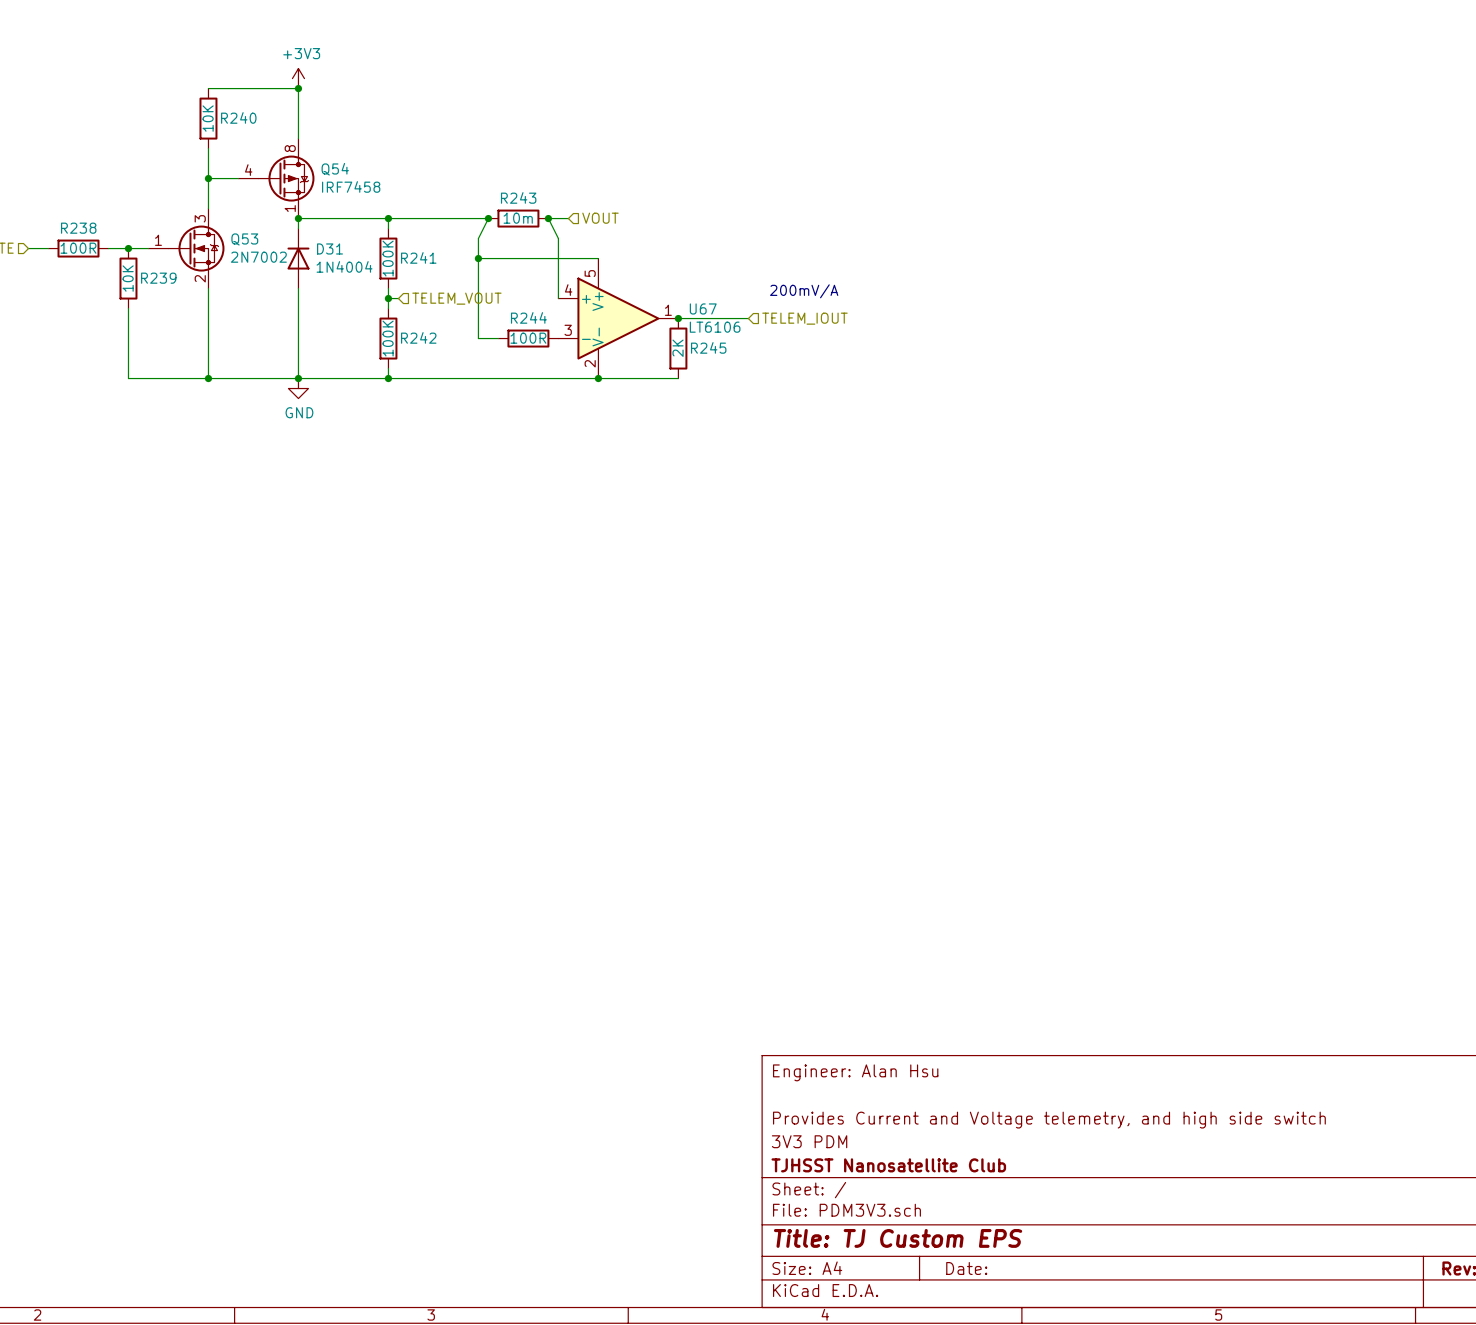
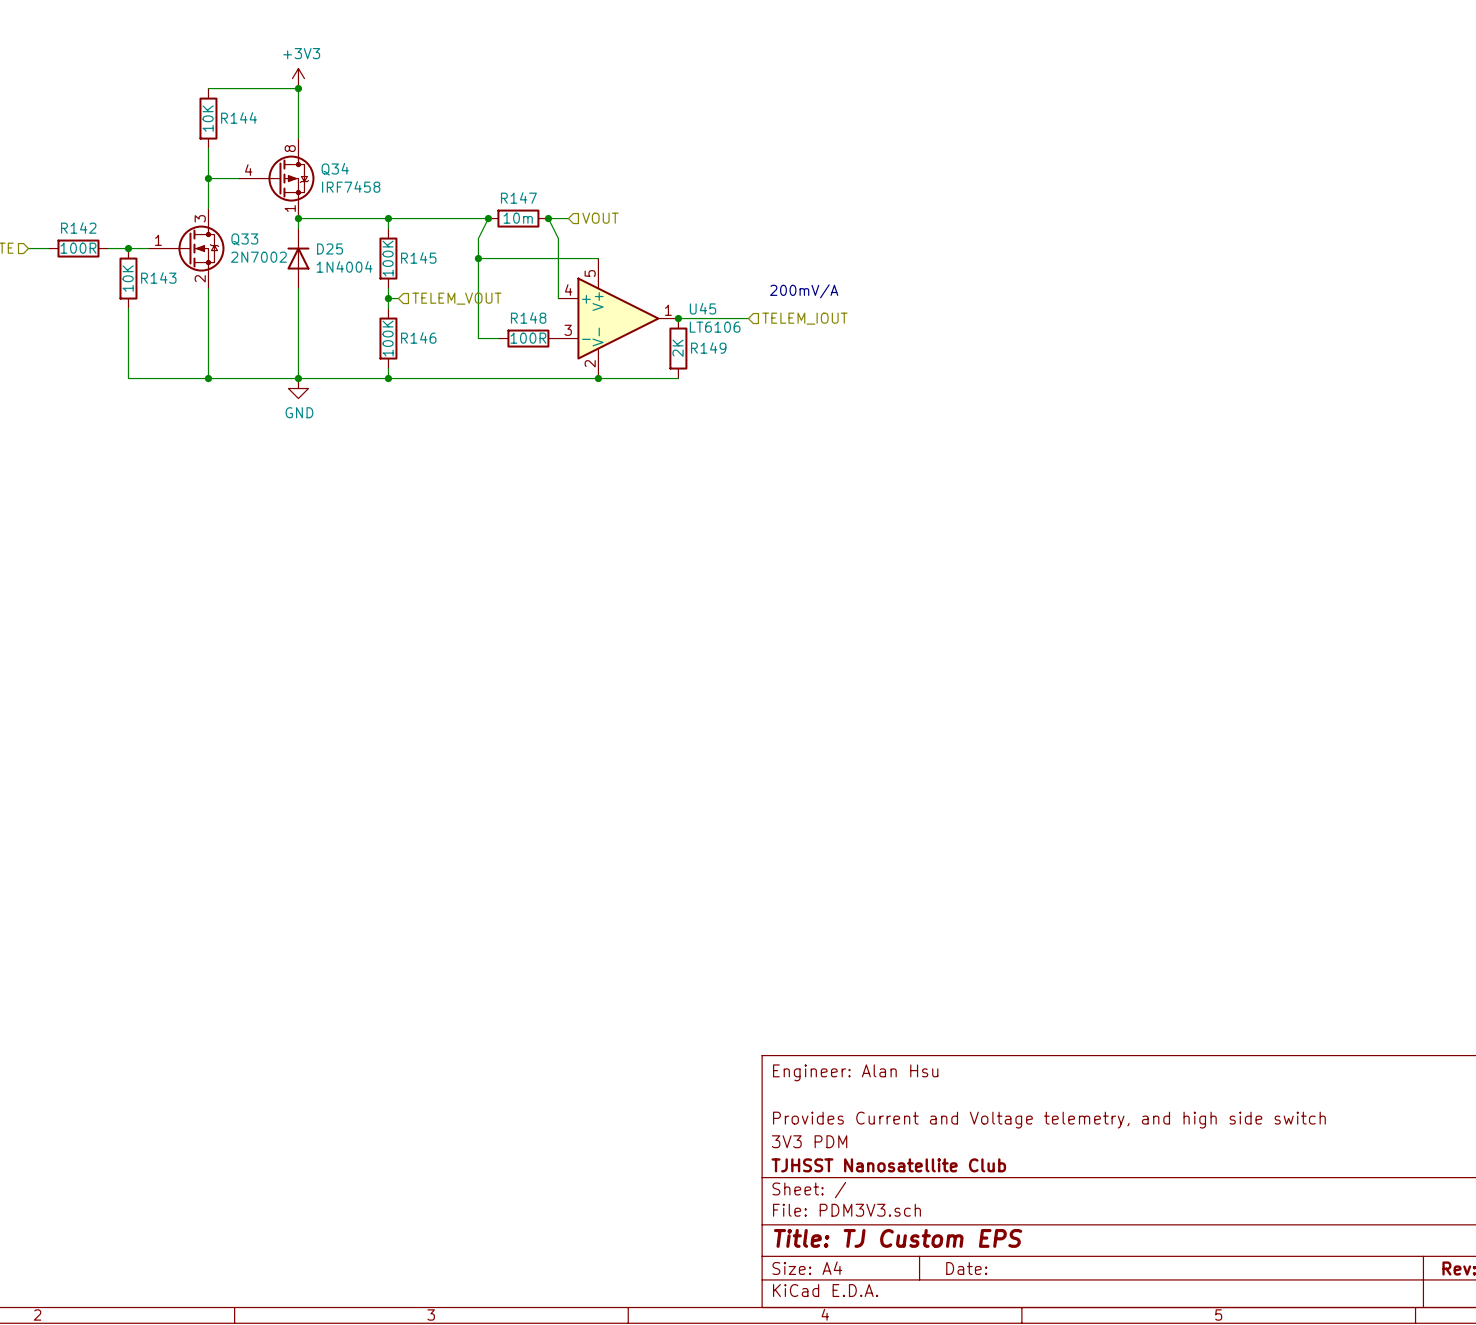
R240 name: R240 (238, 117) -> R144 (239, 117)
Q54 name: Q54 (335, 169) -> Q34 (335, 169)
R243 name: R243 (518, 197) -> R147 (518, 197)
R238 name: R238 (78, 228) -> R142 (78, 227)
Q53 name: Q53 (244, 239) -> Q33 (244, 239)
D31 name: D31 (330, 248) -> D25 (330, 248)
R241 name: R241 (418, 257) -> R145 (418, 257)
R239 name: R239 (158, 278) -> R143 (158, 277)
U67 name: U67 (703, 308) -> U45 (702, 308)
R244 name: R244 (528, 317) -> R148 (528, 317)
R242 name: R242 (418, 337) -> R146 (418, 337)
R245 name: R245 (708, 347) -> R149 (708, 347)

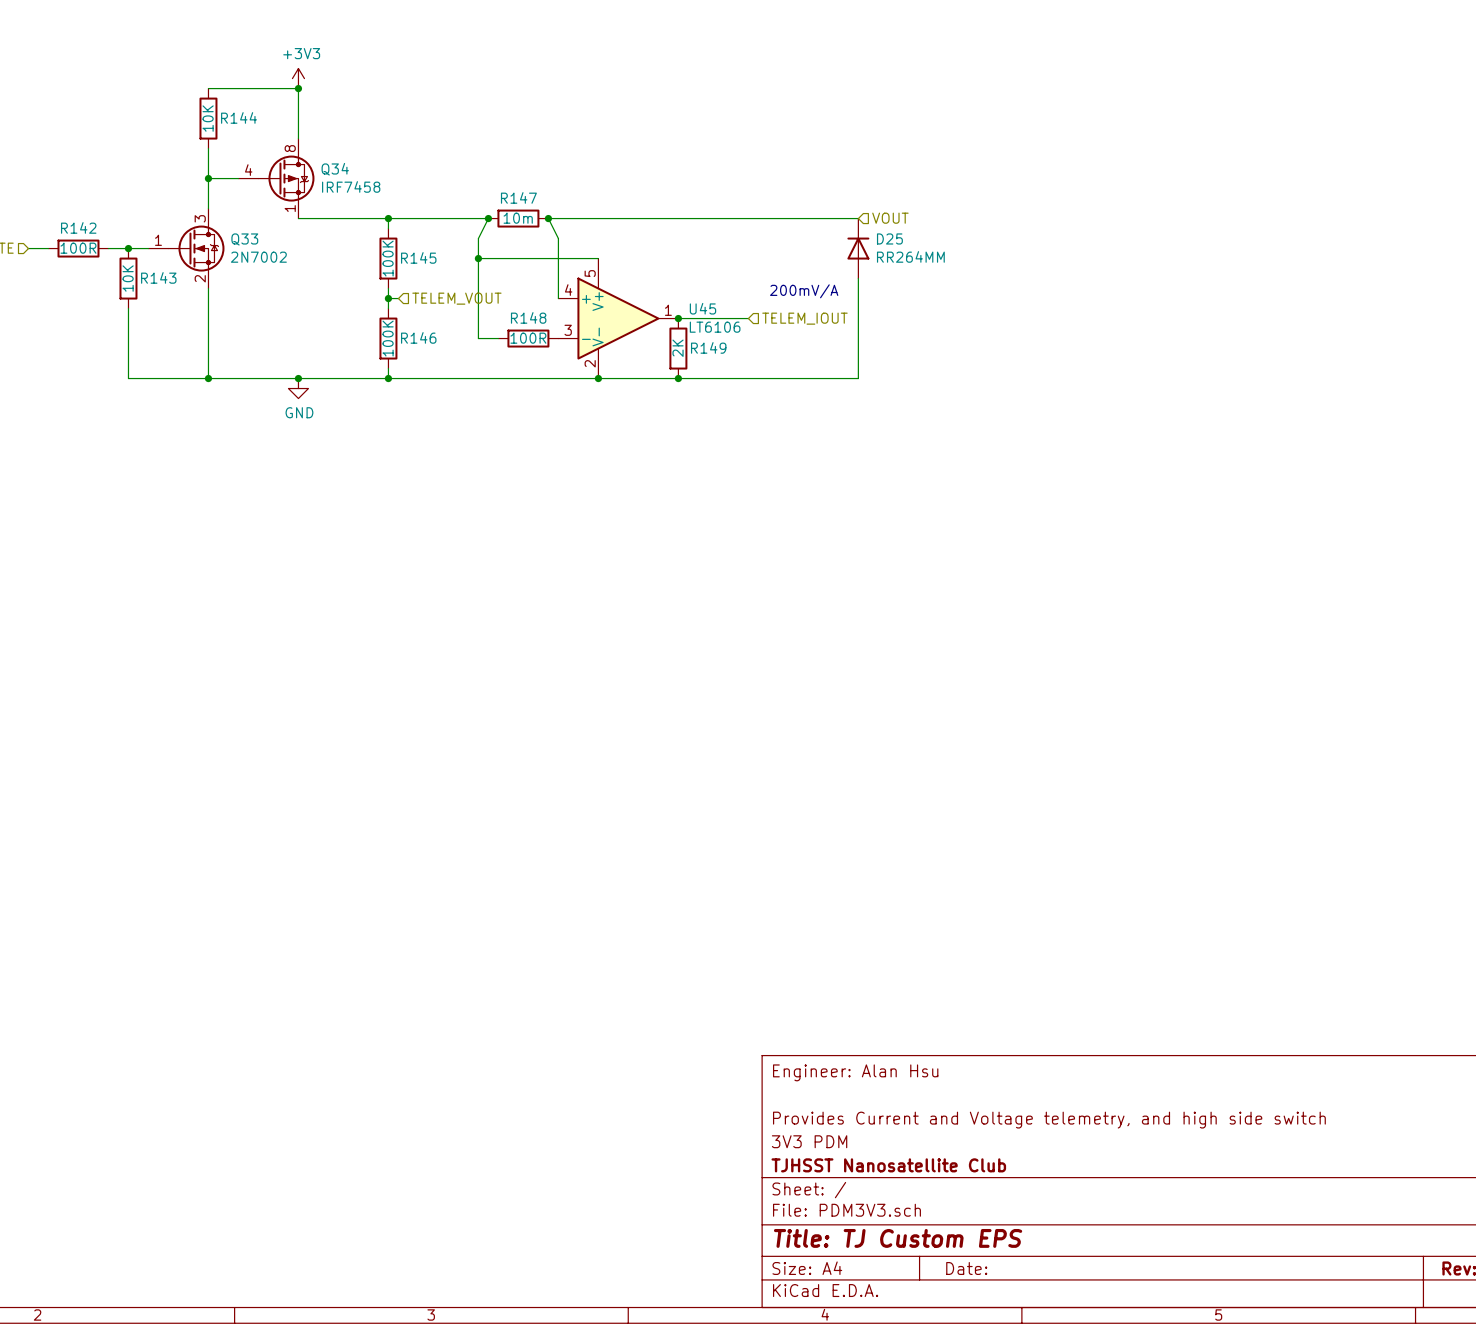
wire: (298, 218) (298, 228) -> none
junction: (298, 218) -> none
wire: none -> (568, 218) (858, 218)
hierarchical label: VOUT (600, 218) -> none
hierarchical label: none -> VOUT (890, 218)
D25 position: (298, 258) -> (858, 248)
D25 value: 1N4004 (344, 266) -> RR264MM (910, 256)
wire: none -> (858, 278) (858, 378) (678, 378)
wire: (298, 288) (298, 378) -> none
junction: none -> (678, 378)

